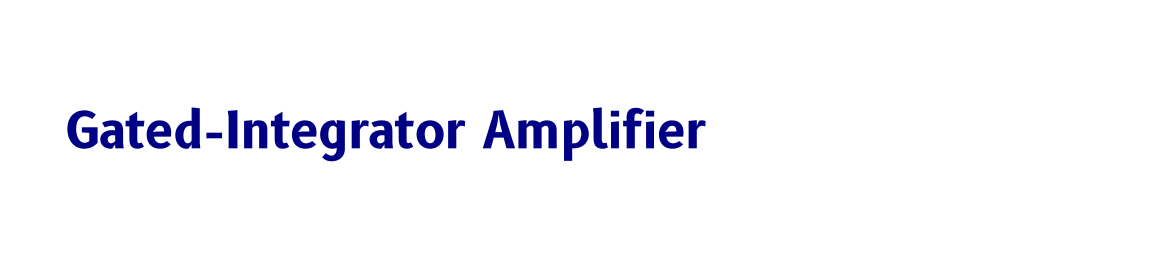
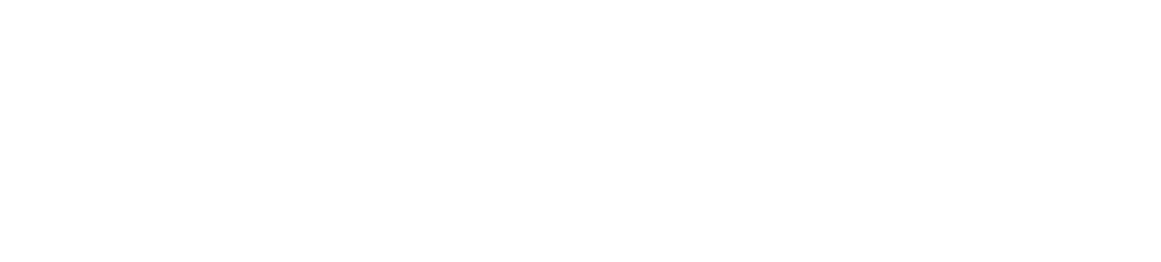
text: Gated-Integrator Amplifier (386, 134) -> none

